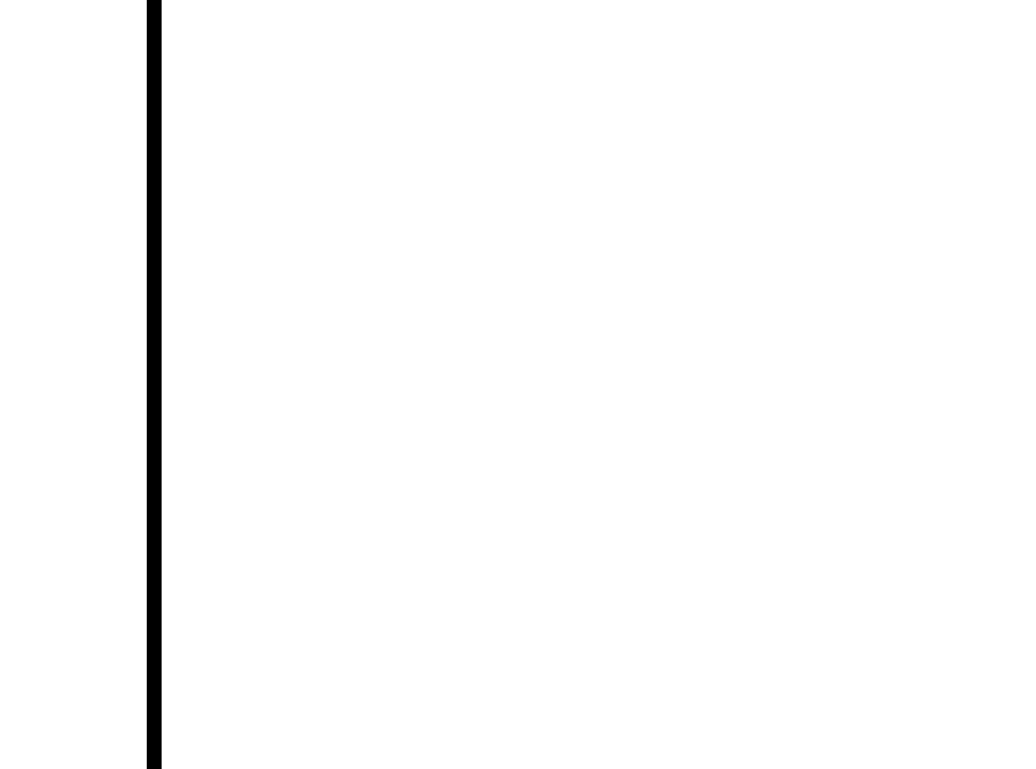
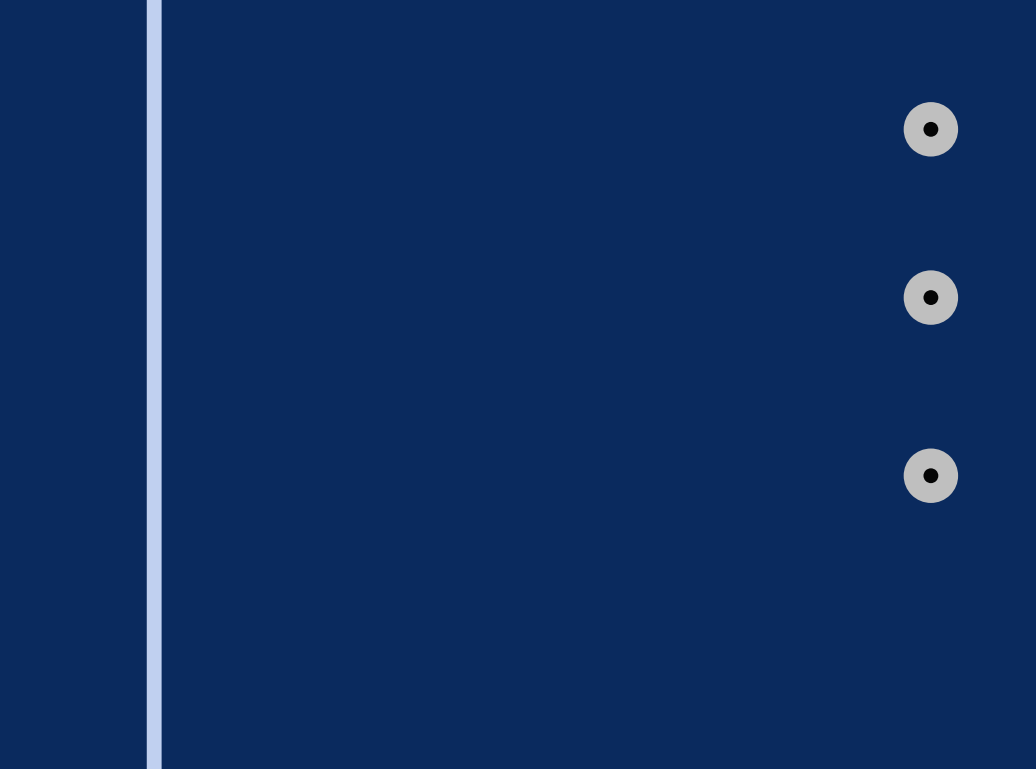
via: none -> (930, 129)
via: none -> (930, 297)
via: none -> (930, 475)

